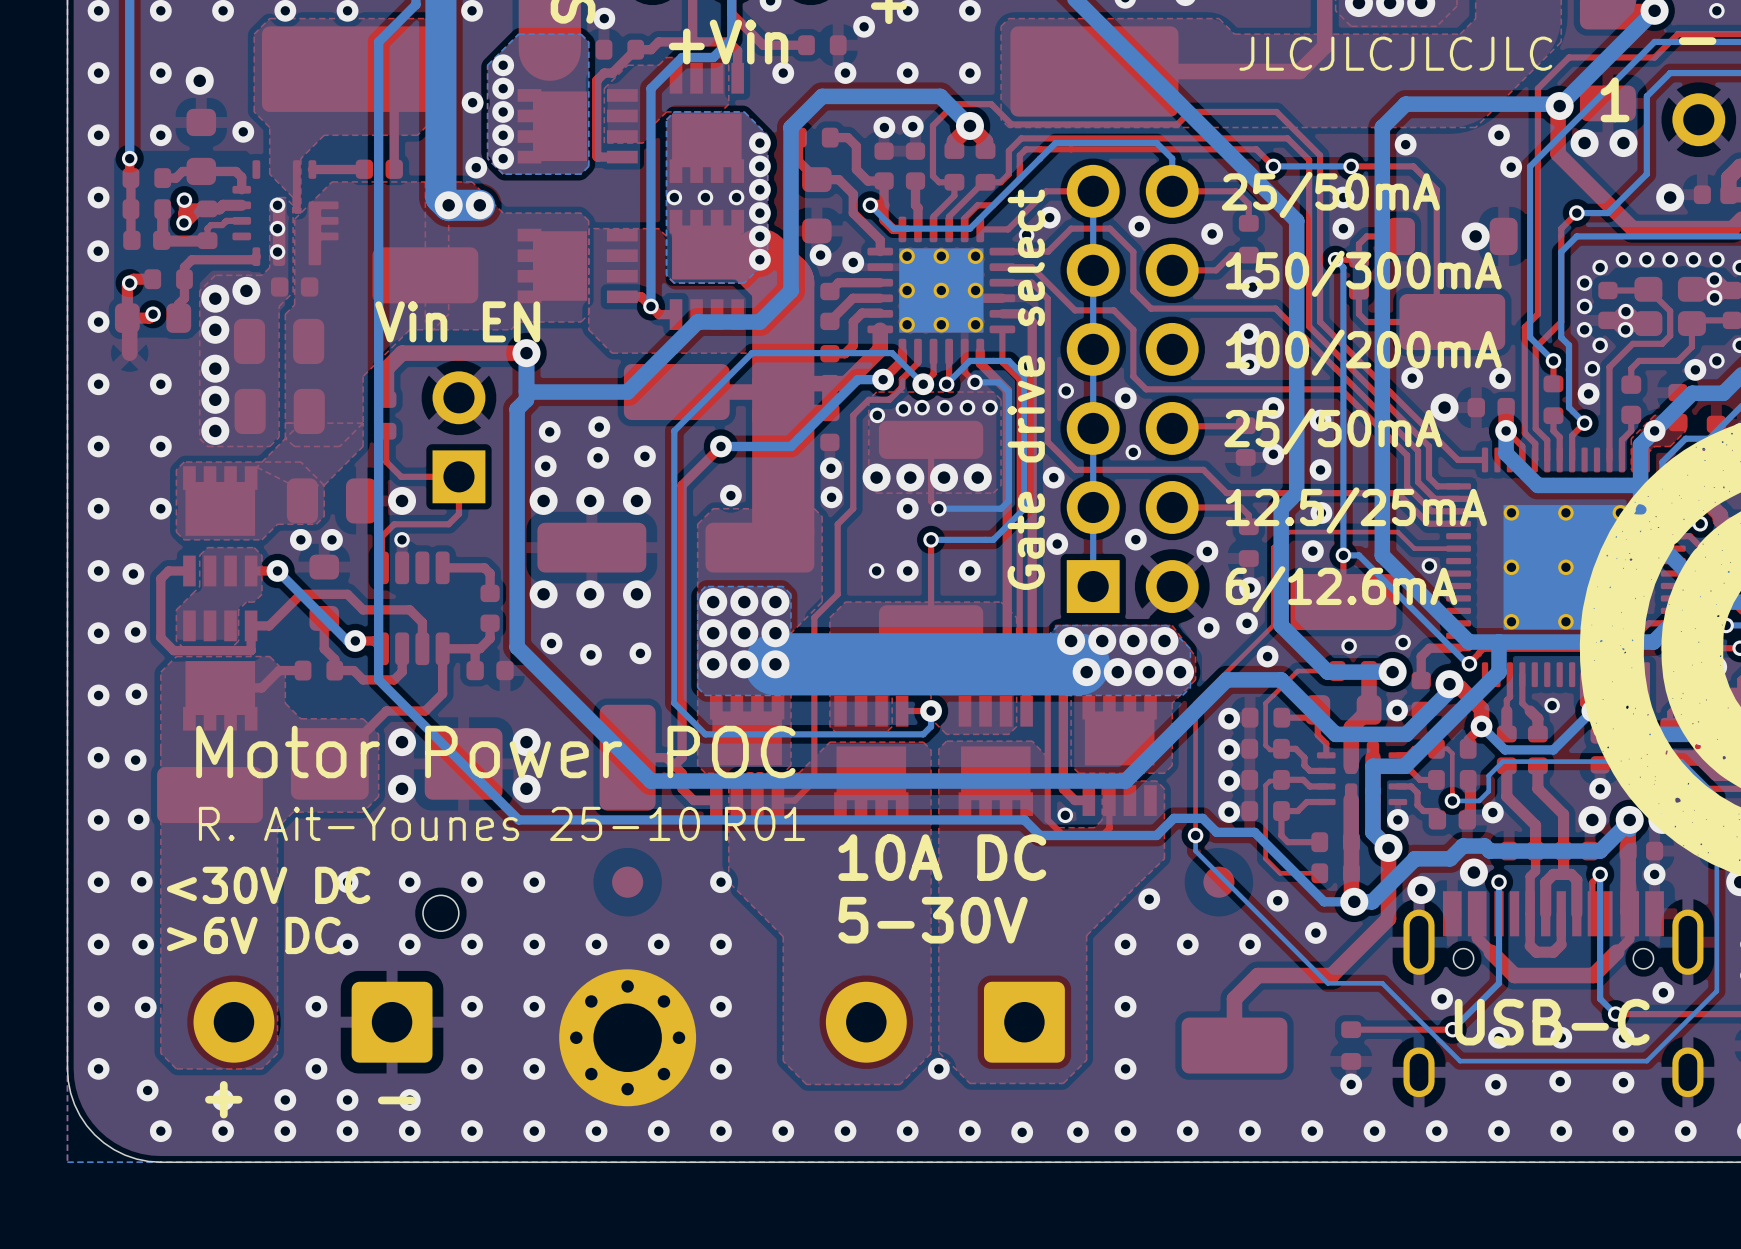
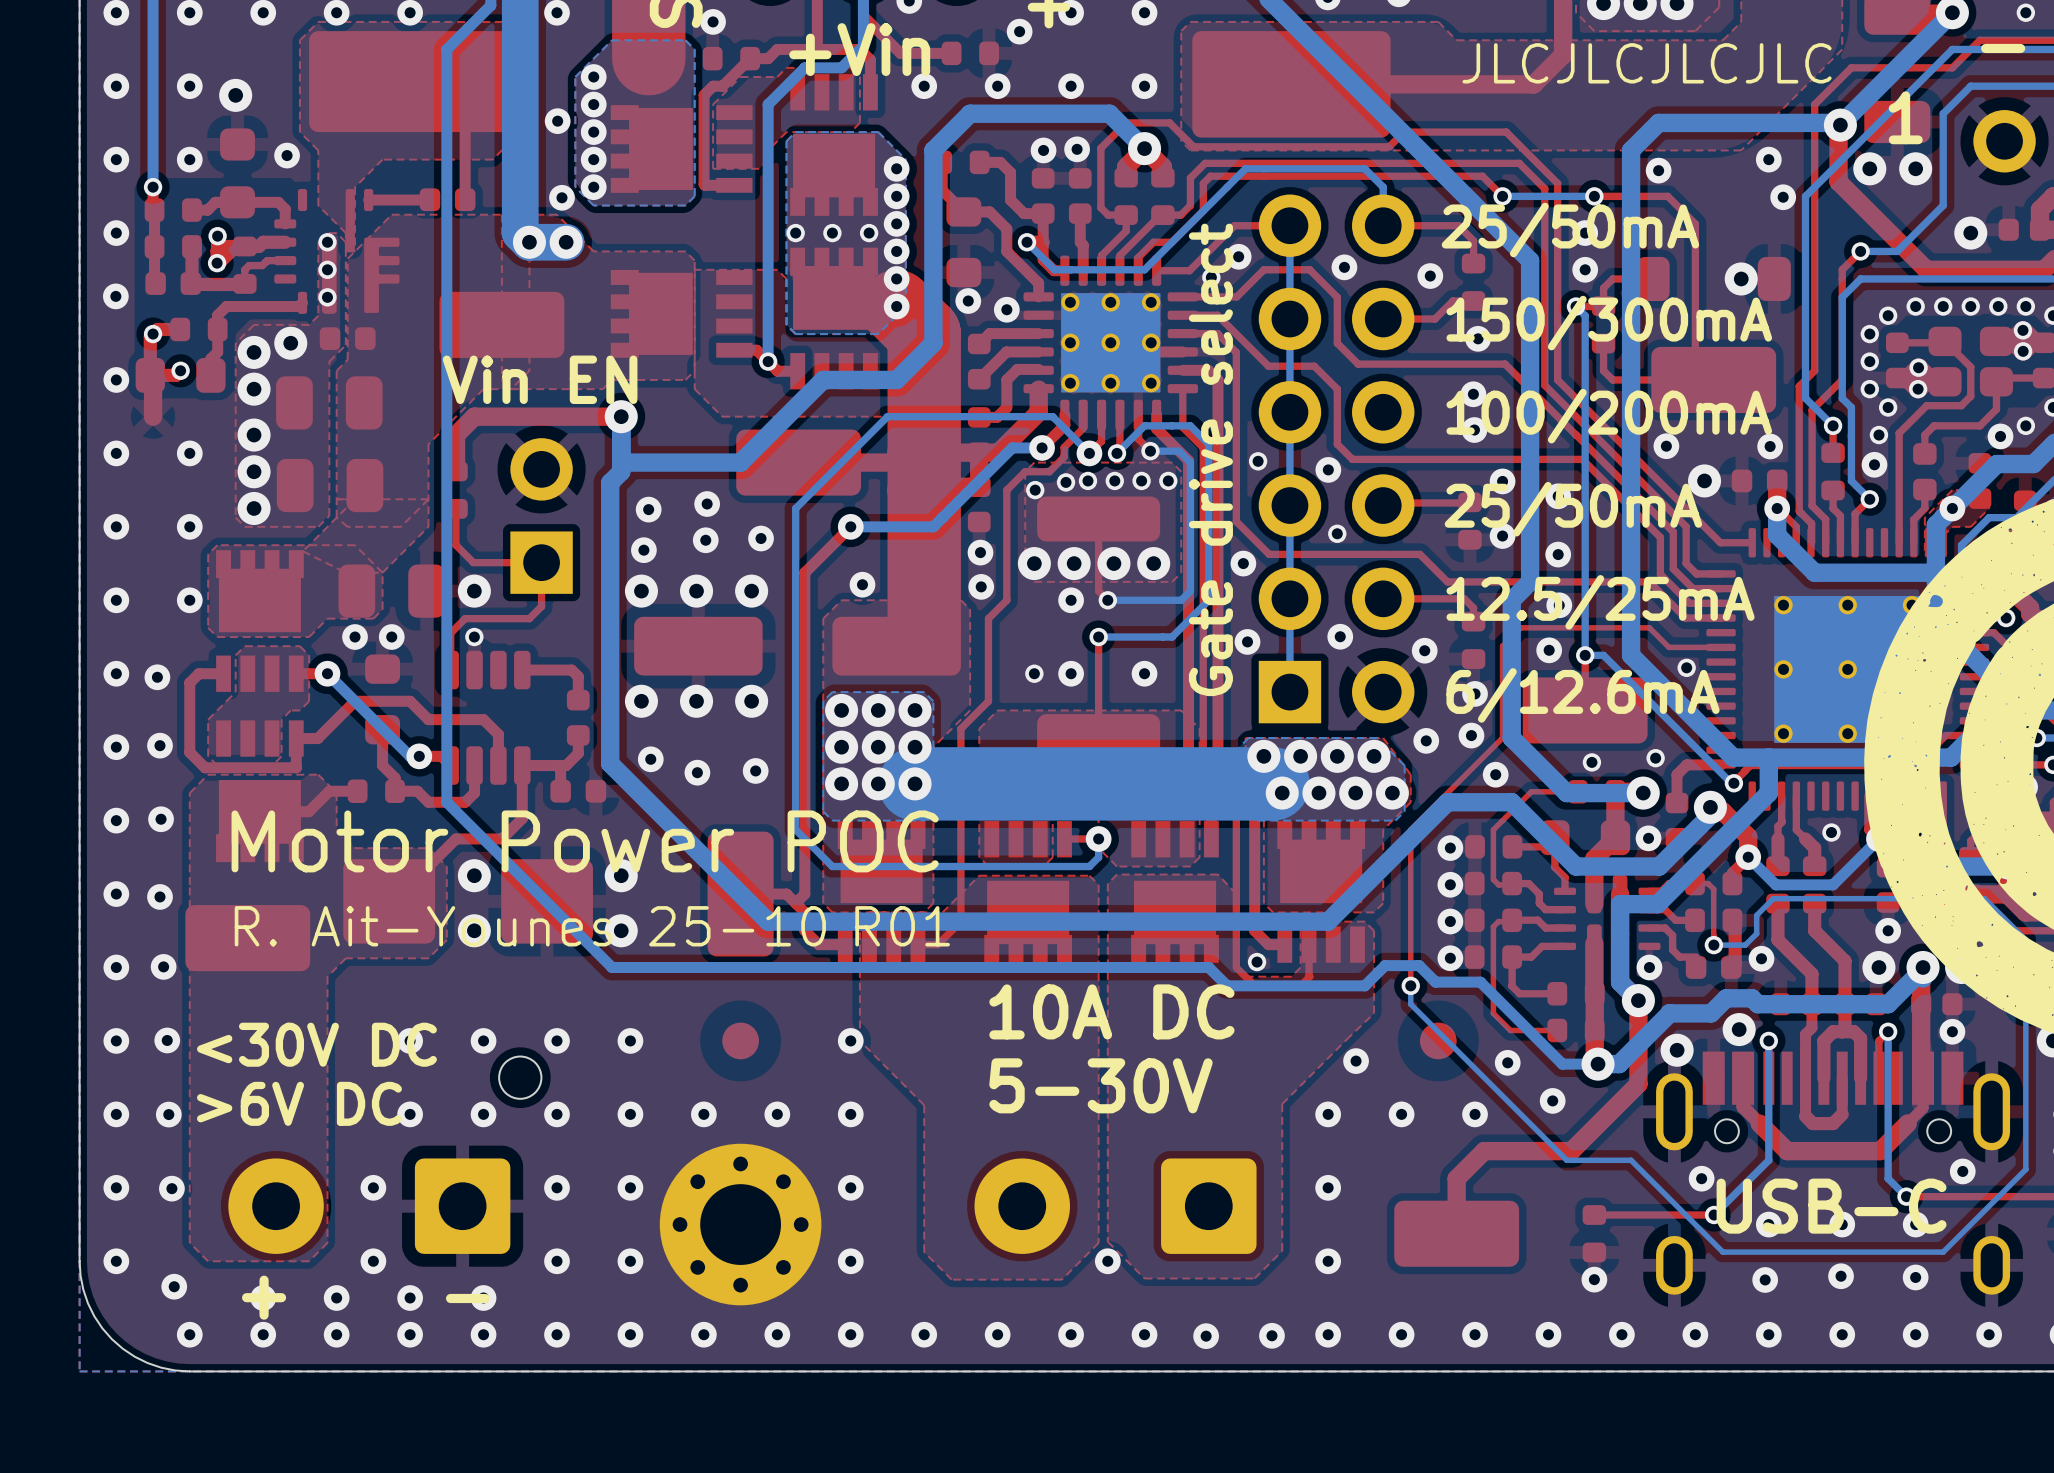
text position: Motor Power POC (495, 751) -> Motor Power POC (585, 841)
text position: R. Ait-Younes 25-10 (449, 823) -> R. Ait-Younes 25-10 (530, 926)
text position: R01 (764, 823) -> R01 (902, 926)

